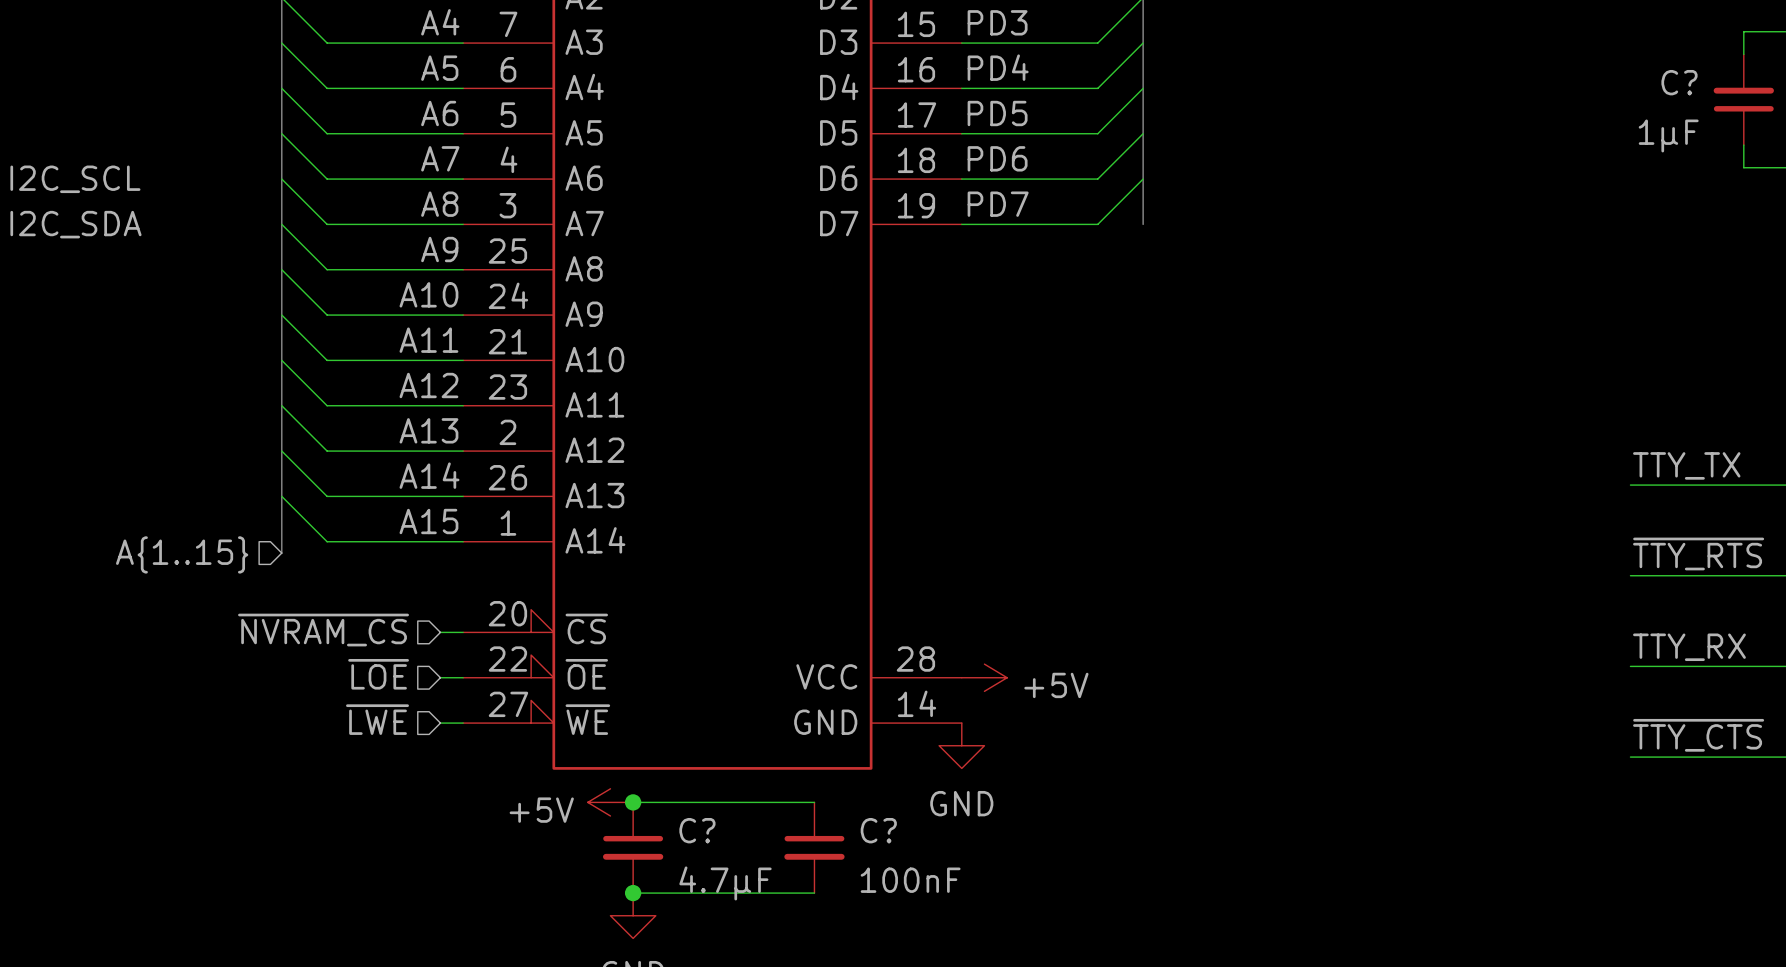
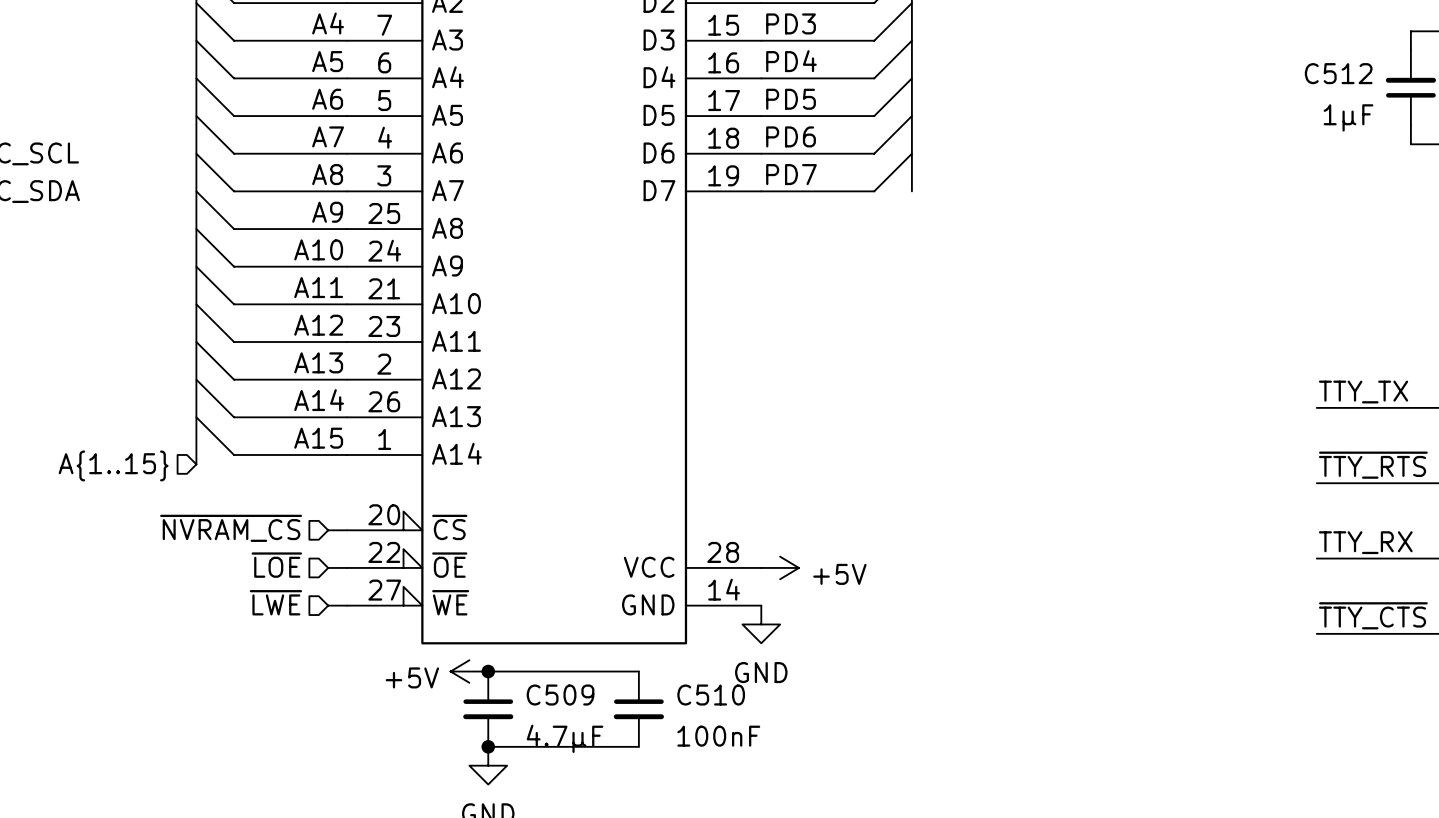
C? name: C? (1679, 82) -> C512 (1338, 73)
C? name: C? (697, 830) -> C509 (560, 695)
C? name: C? (878, 830) -> C510 (711, 695)

